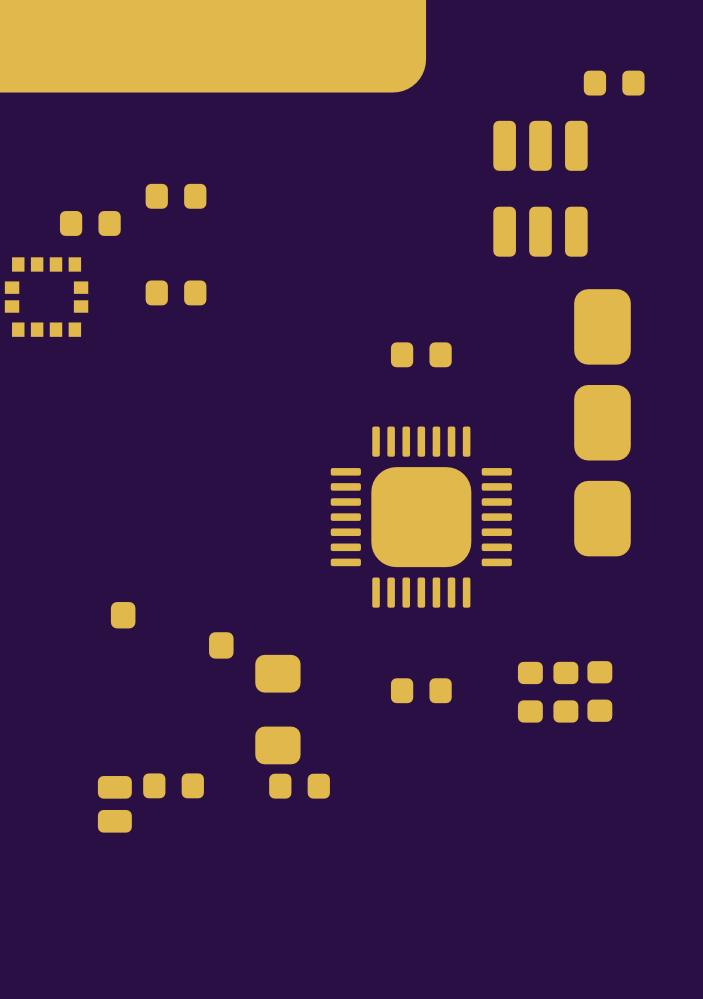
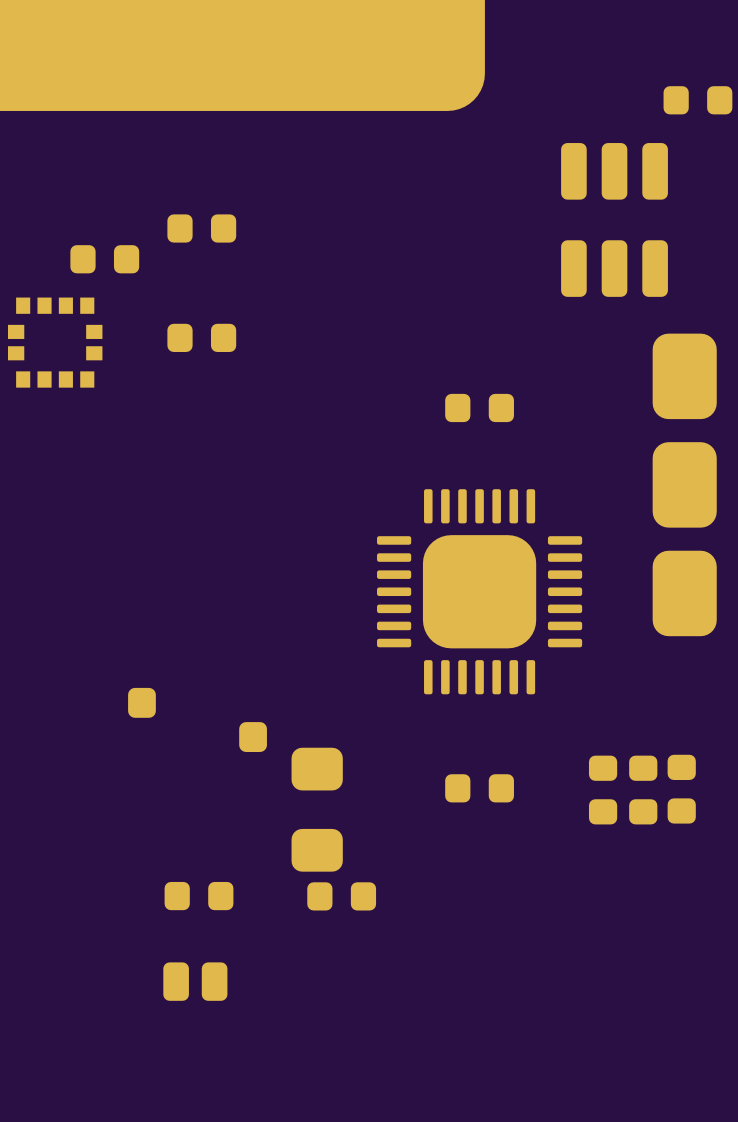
part rotation: 0° (114, 804) -> 90° clockwise (195, 981)
part position: (114, 804) -> (195, 981)

